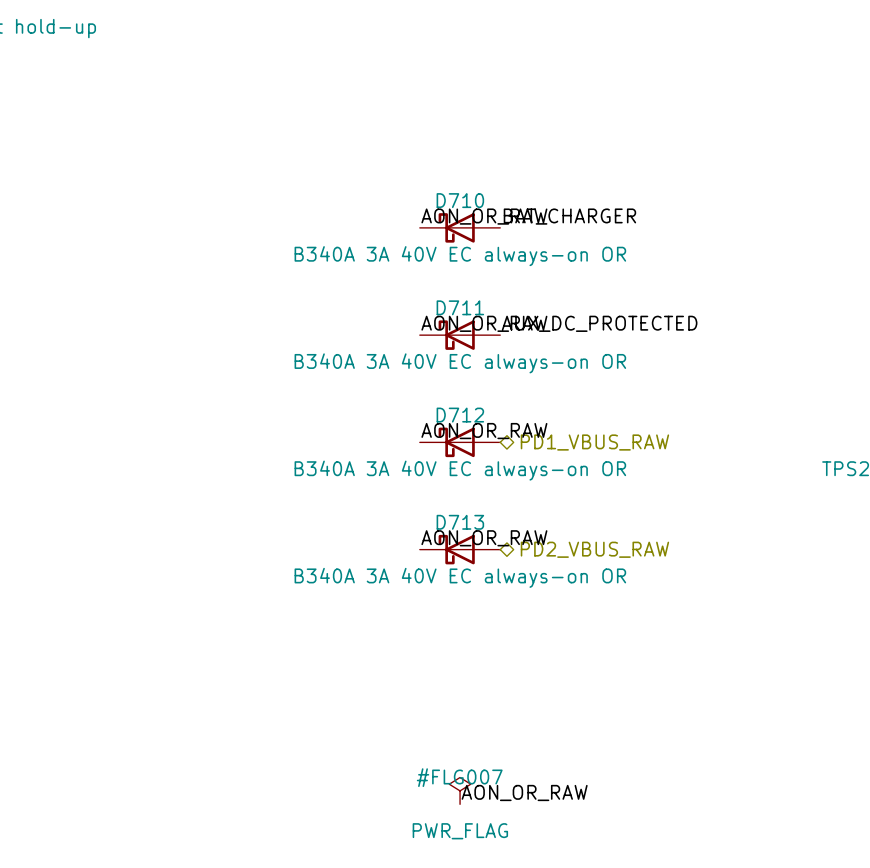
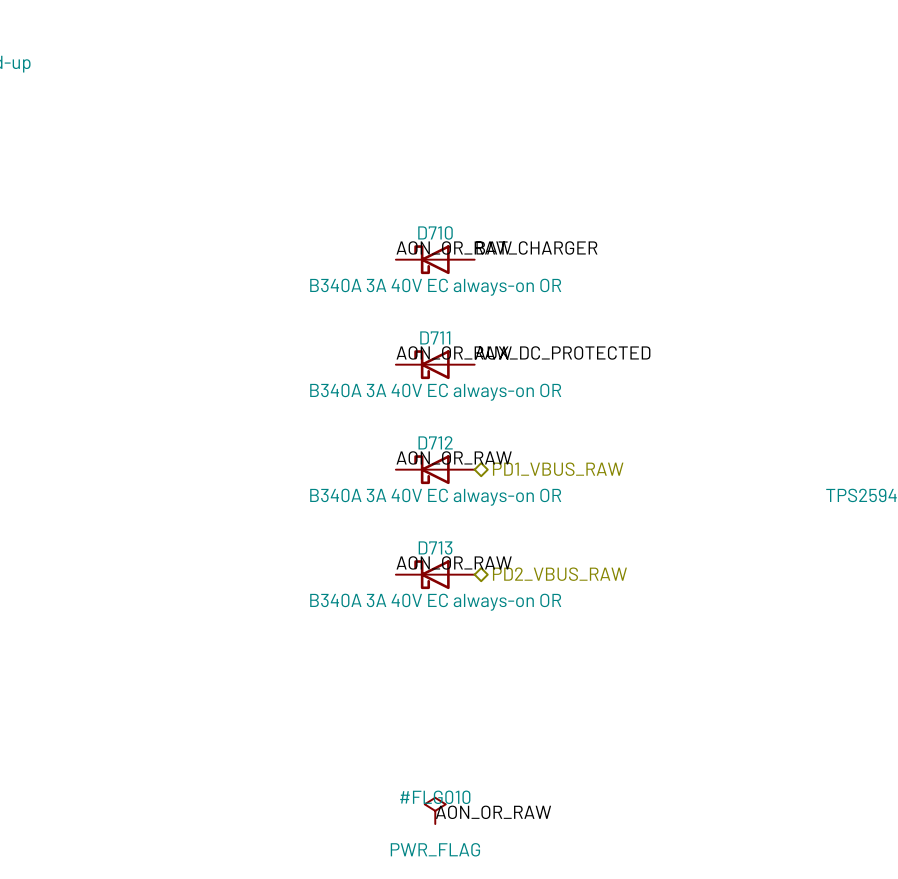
#FLG007 name: #FLG007 (459, 777) -> #FLG010 (435, 797)

